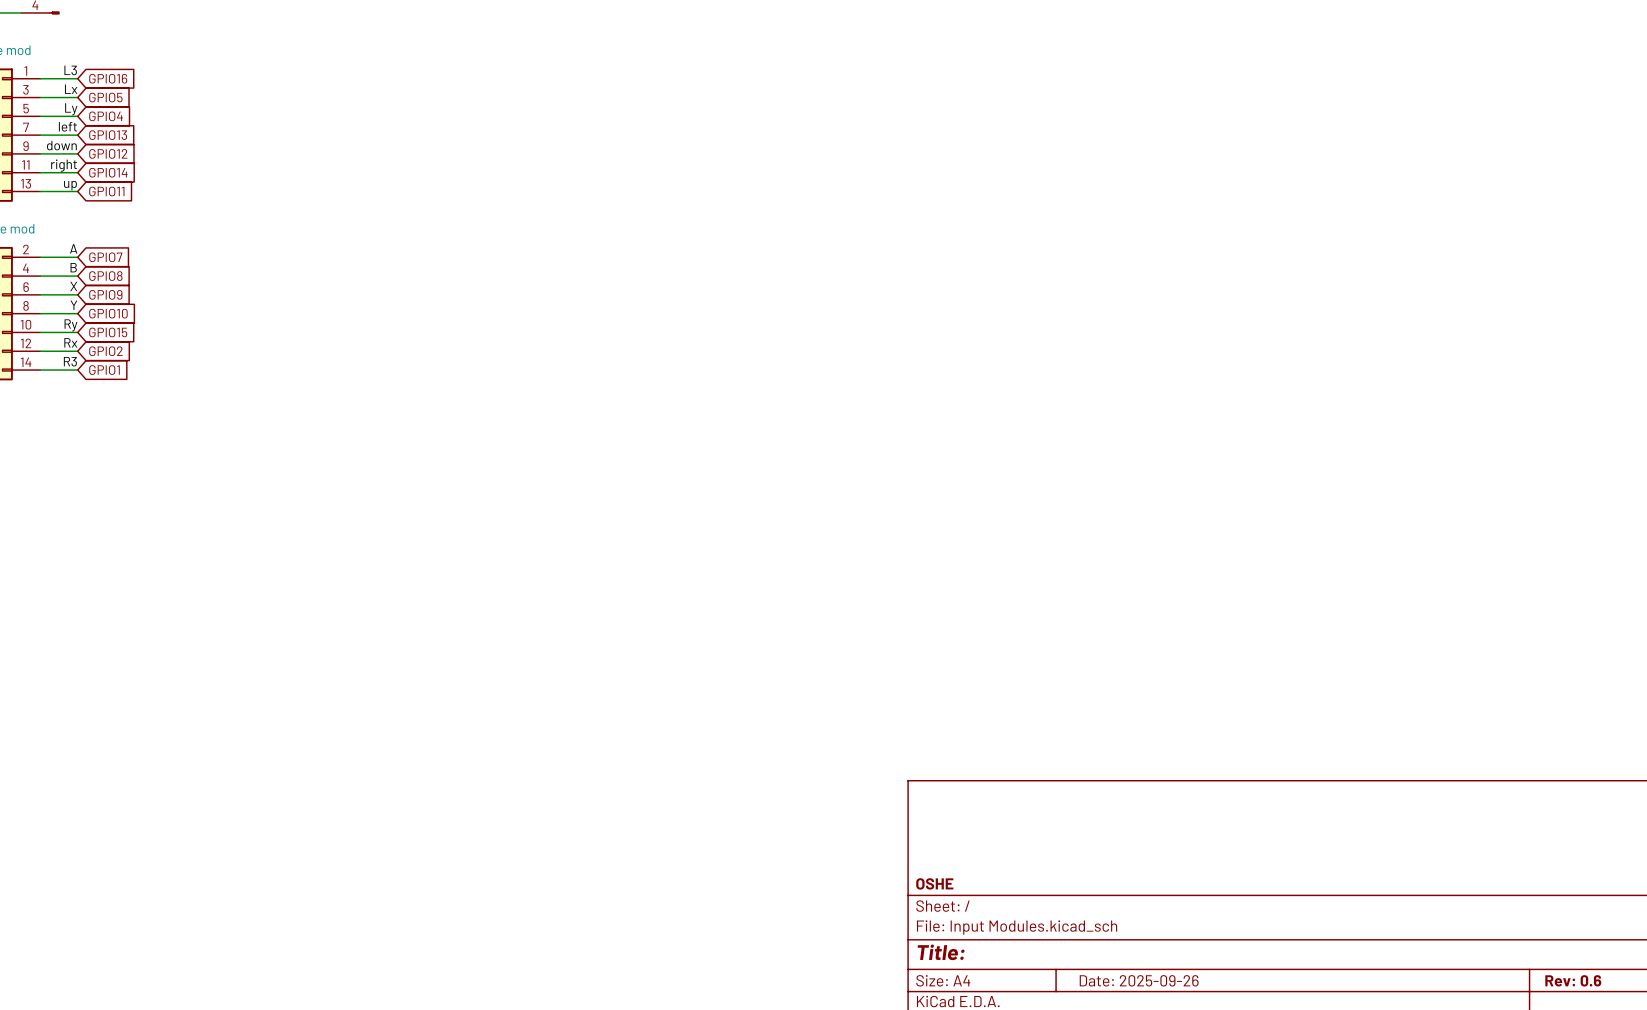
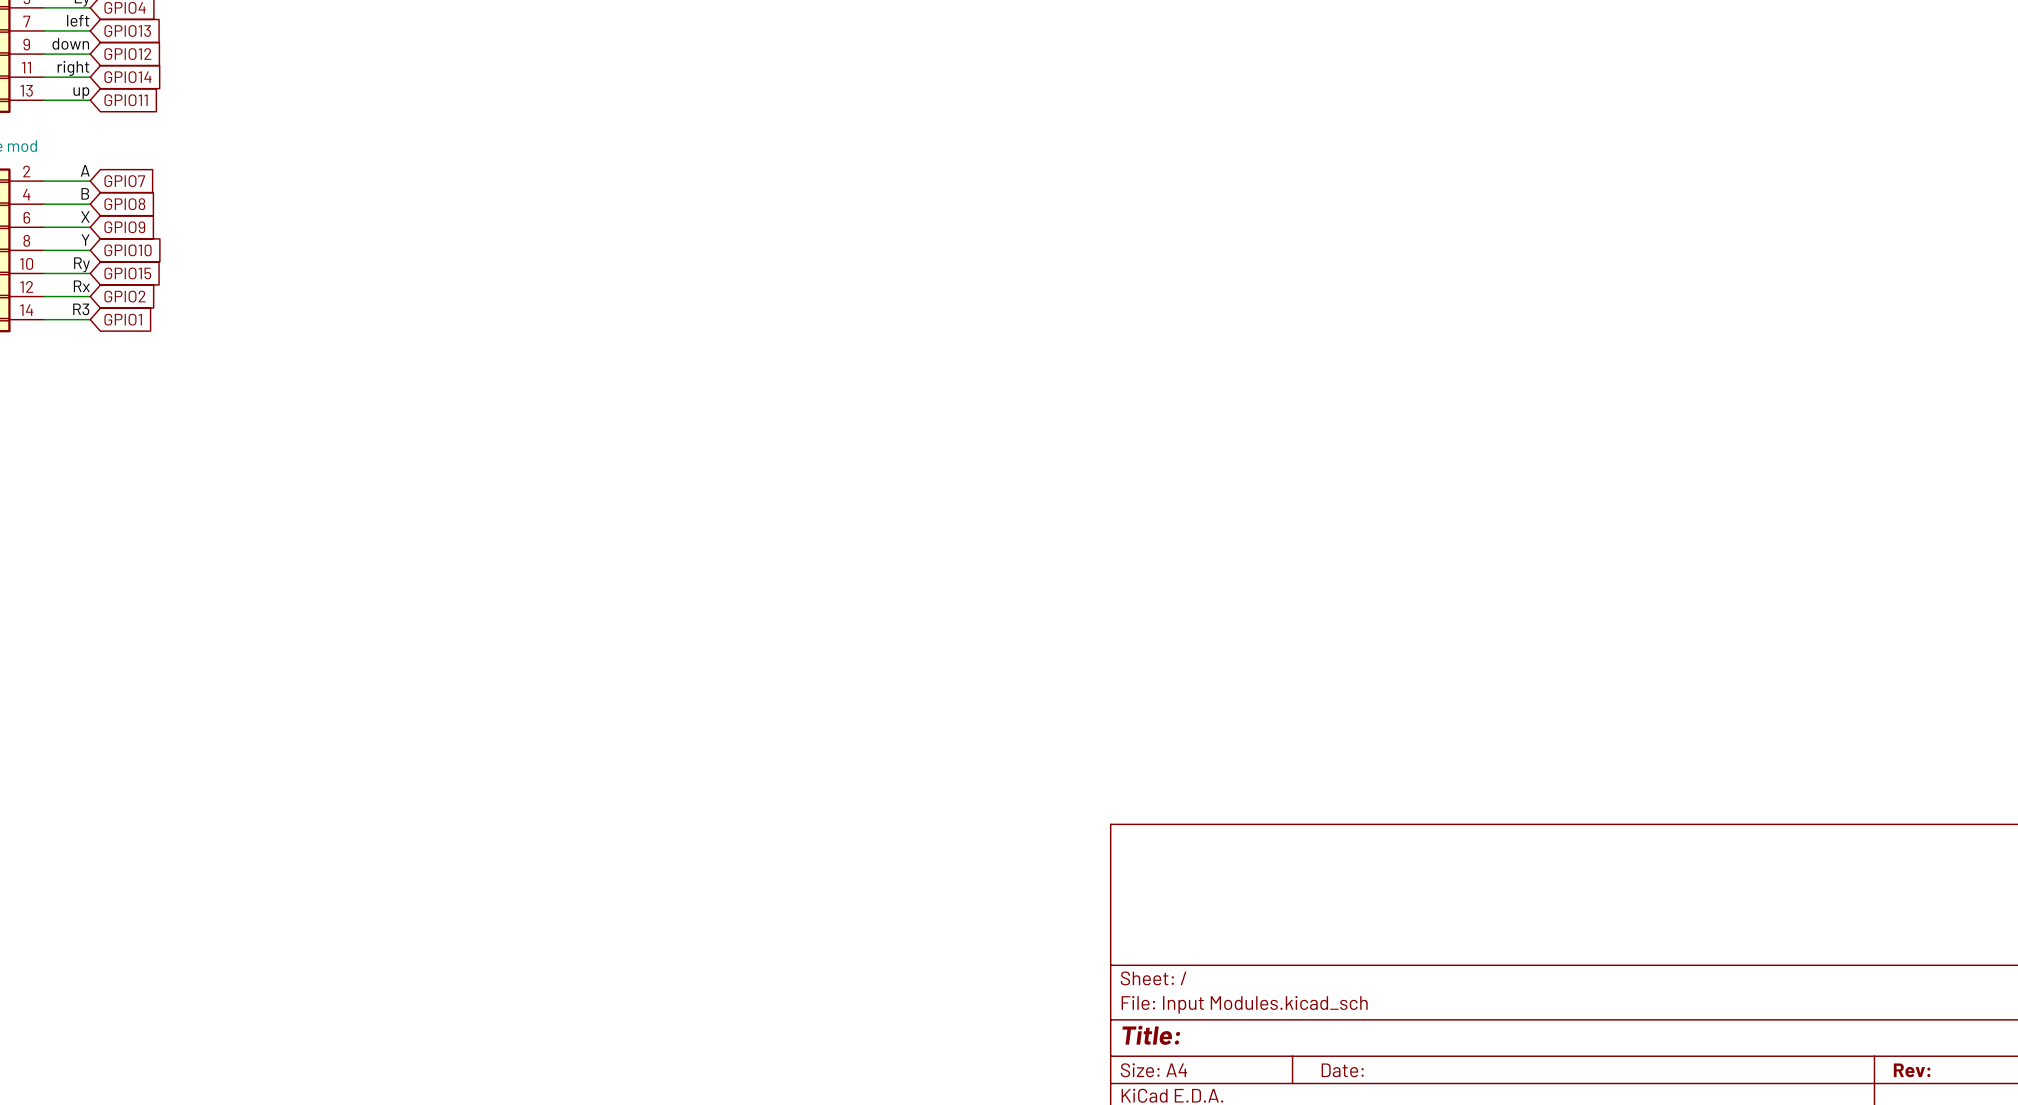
title block: OSHE (934, 883) -> none
title block: Date: 2025-09-26 (1139, 980) -> Date: (1342, 1070)
title block: Rev: 0.6 (1573, 980) -> Rev: (1912, 1070)

